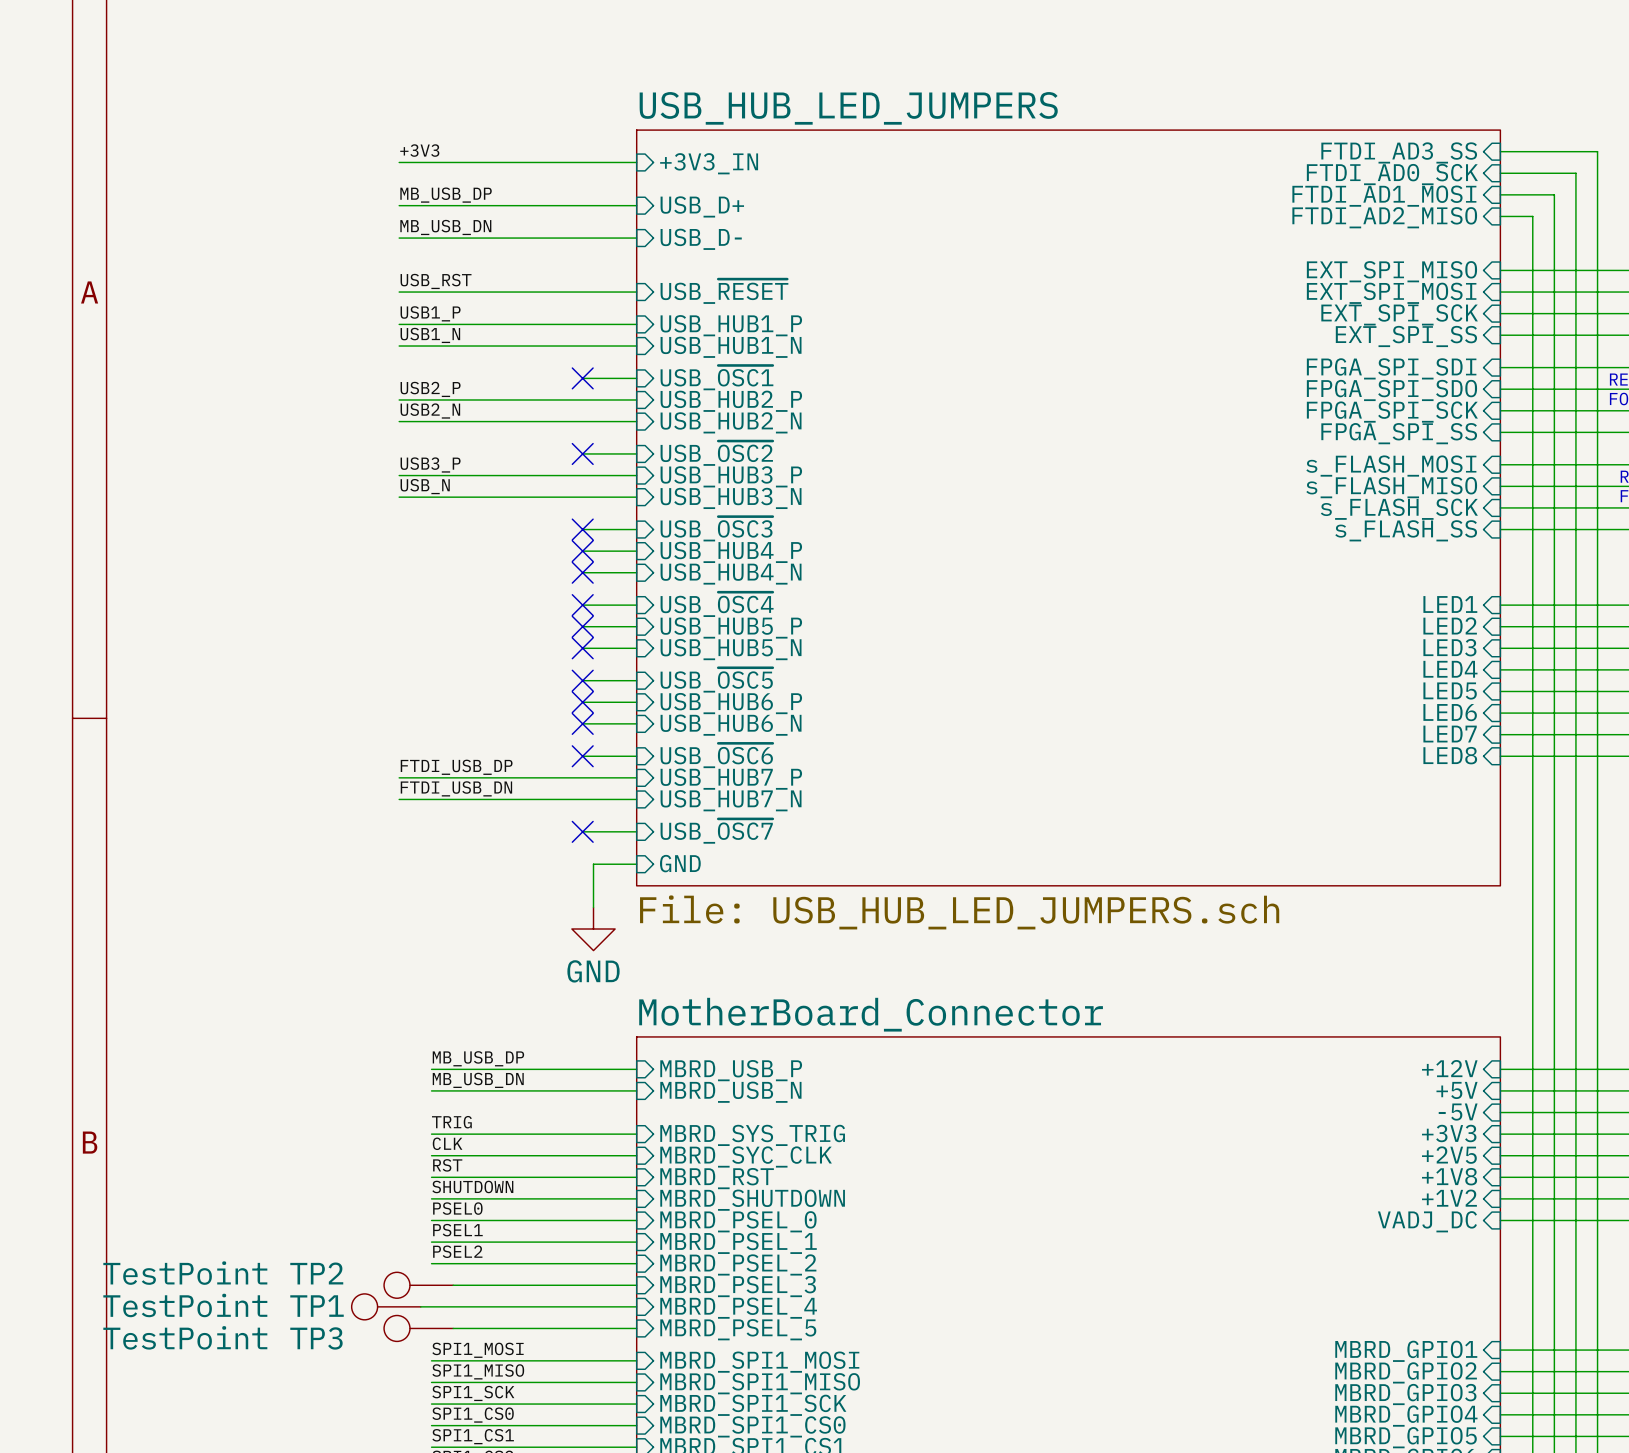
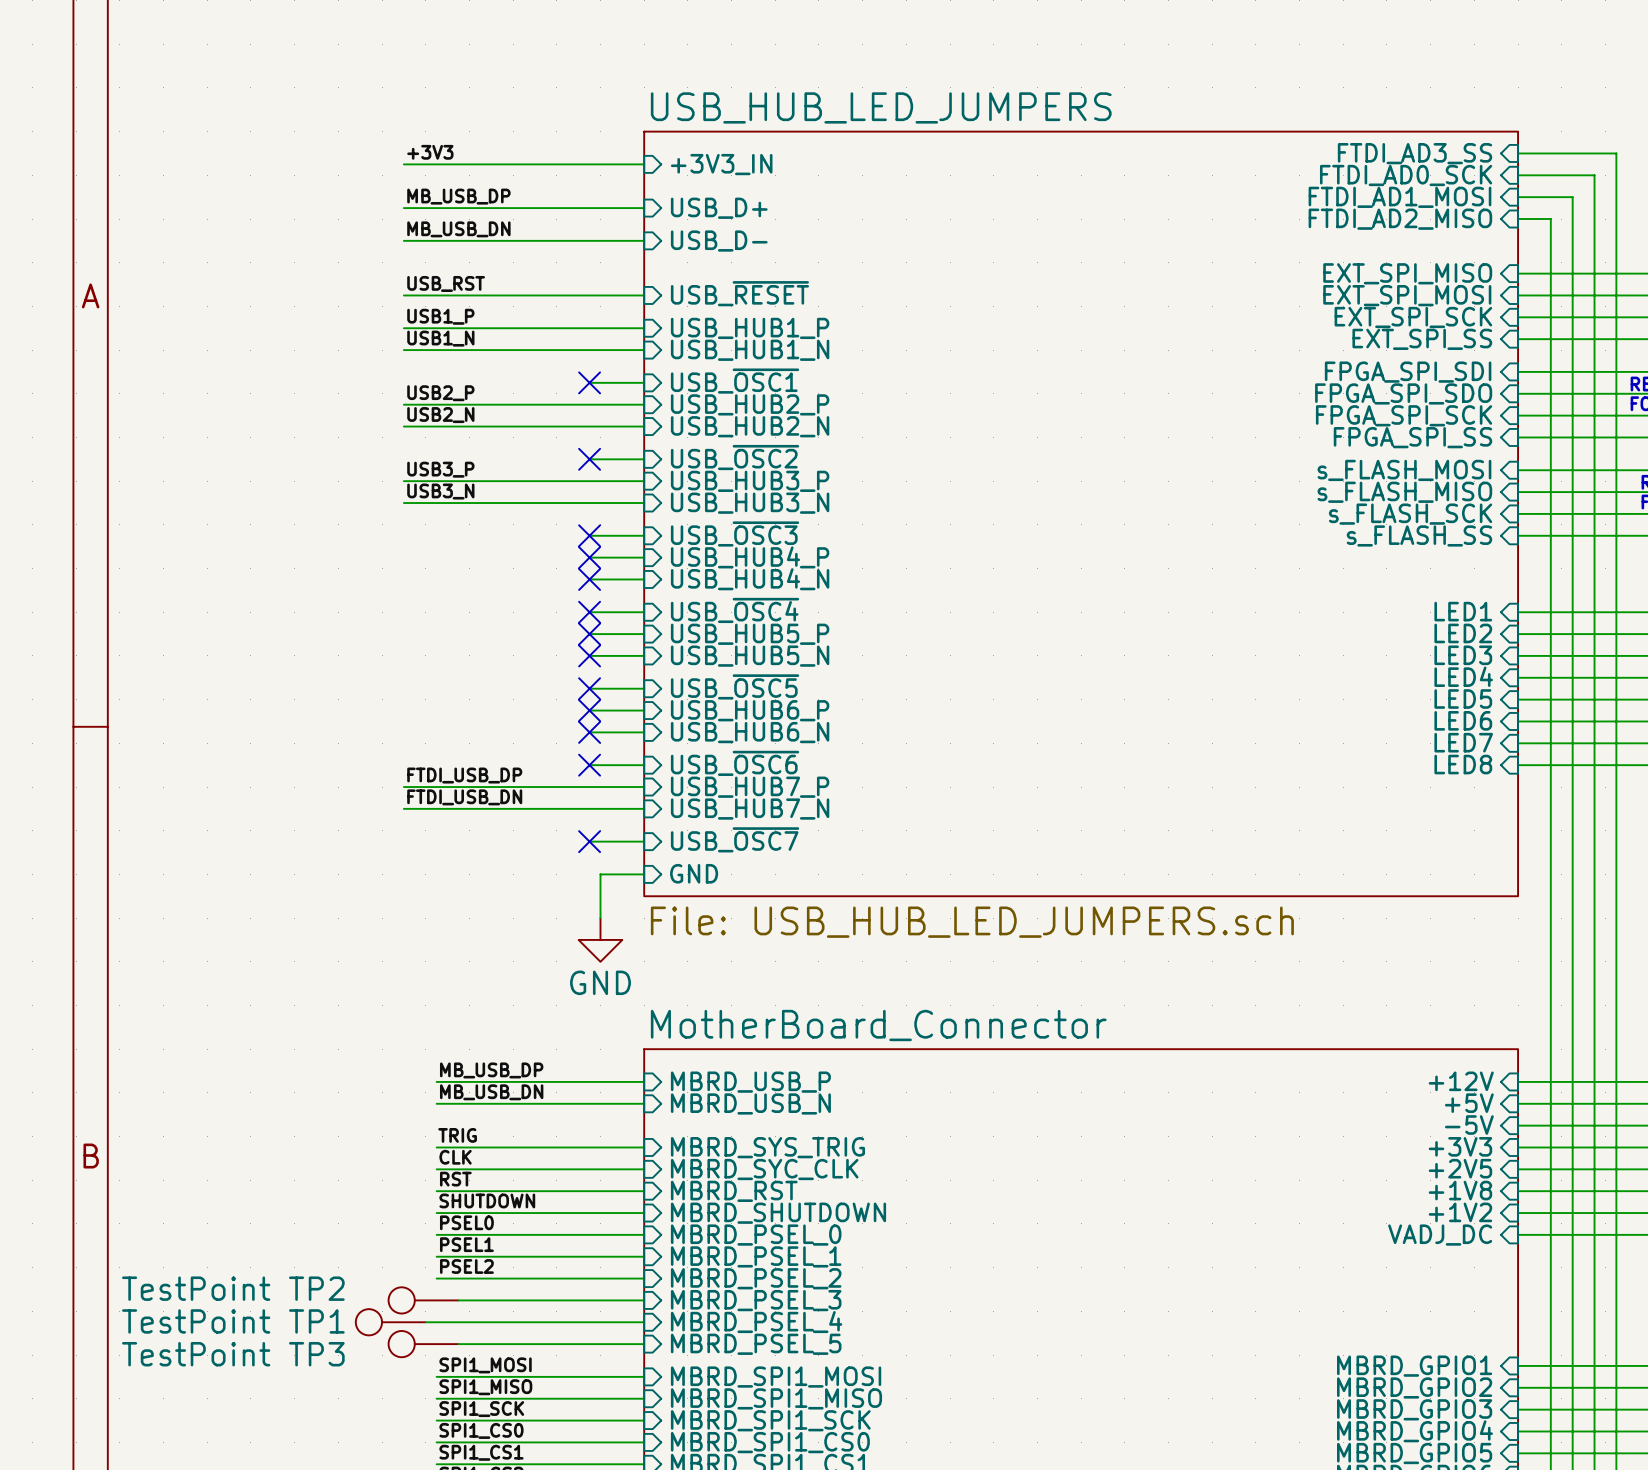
label: USB_N (425, 486) -> USB3_N (440, 491)

